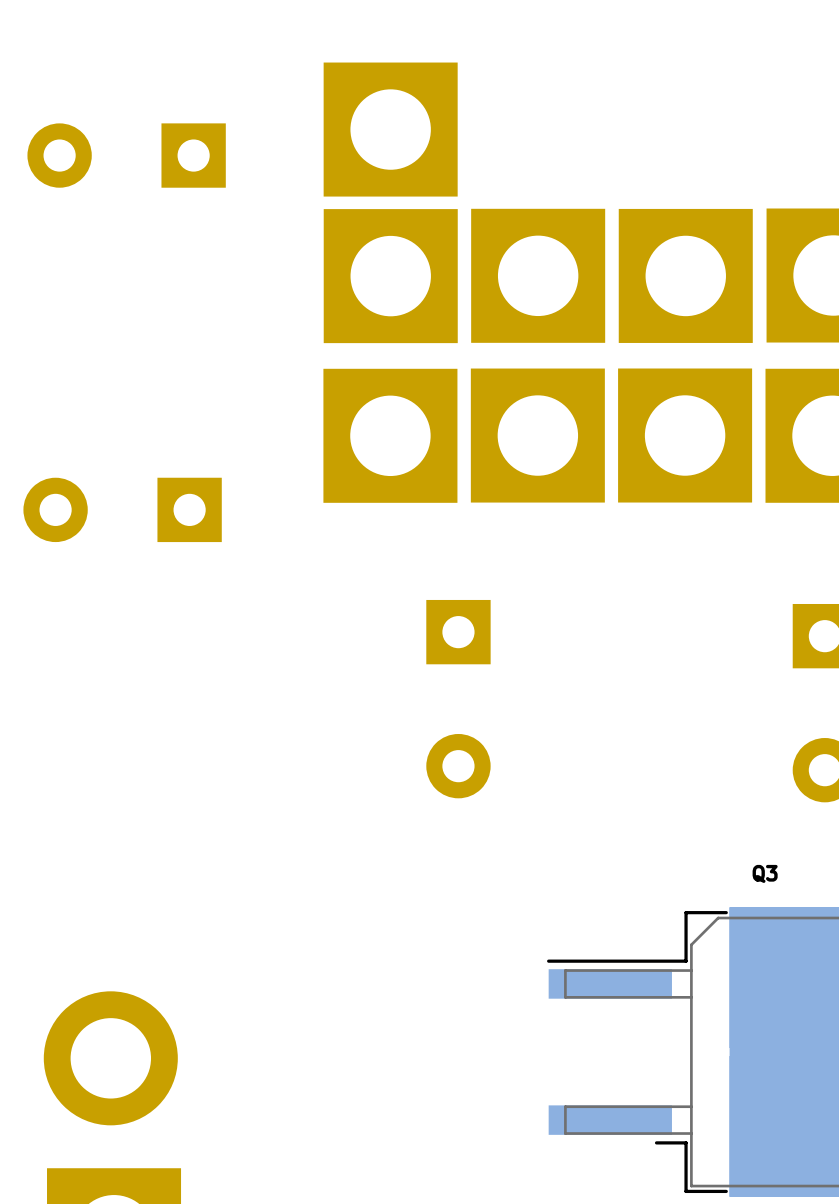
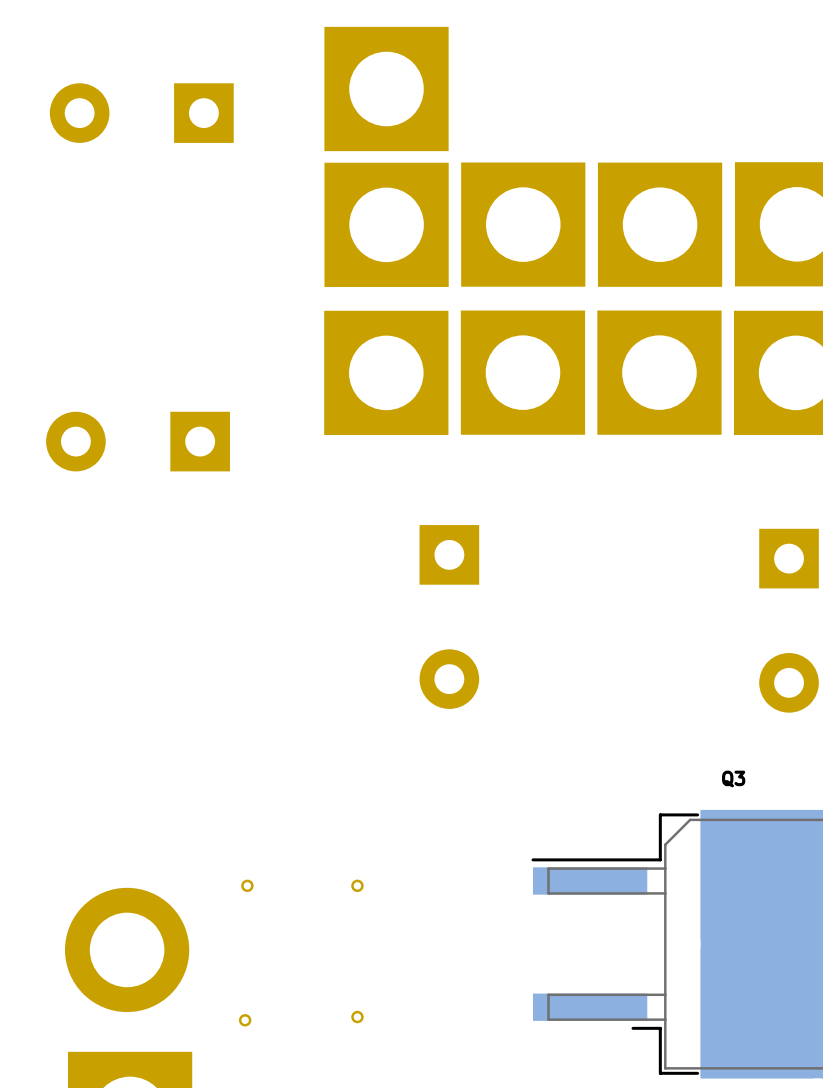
part: none -> (247, 885)
part: none -> (357, 885)
part: none -> (357, 1017)
part: none -> (245, 1020)

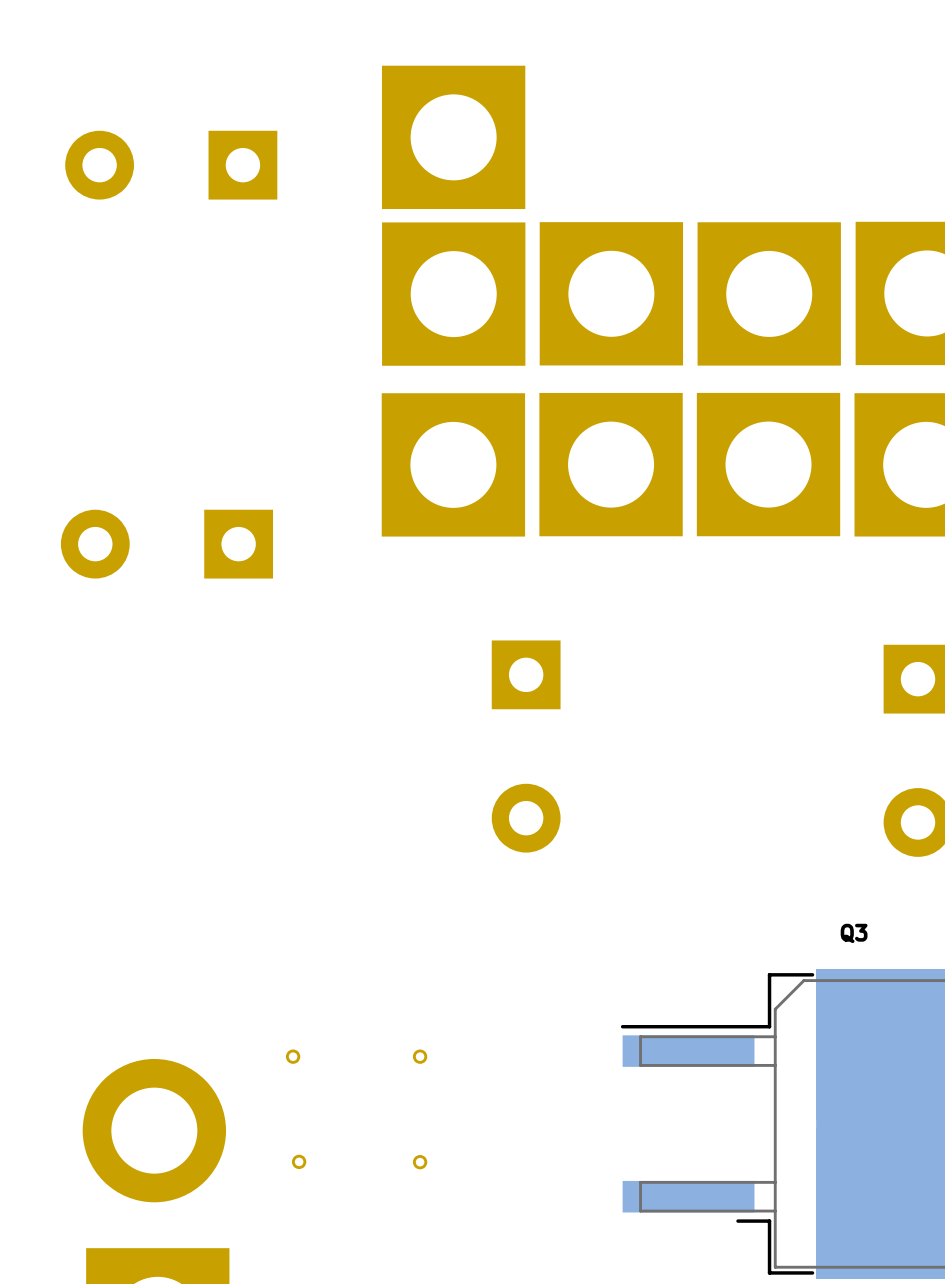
part position: (357, 1017) -> (420, 1162)
part position: (245, 1020) -> (299, 1161)

